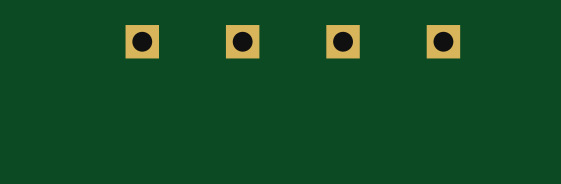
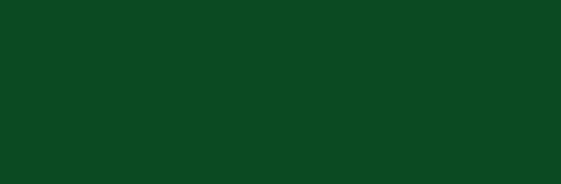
part: (142, 41) -> none
part: (242, 41) -> none
part: (343, 41) -> none
part: (443, 41) -> none

